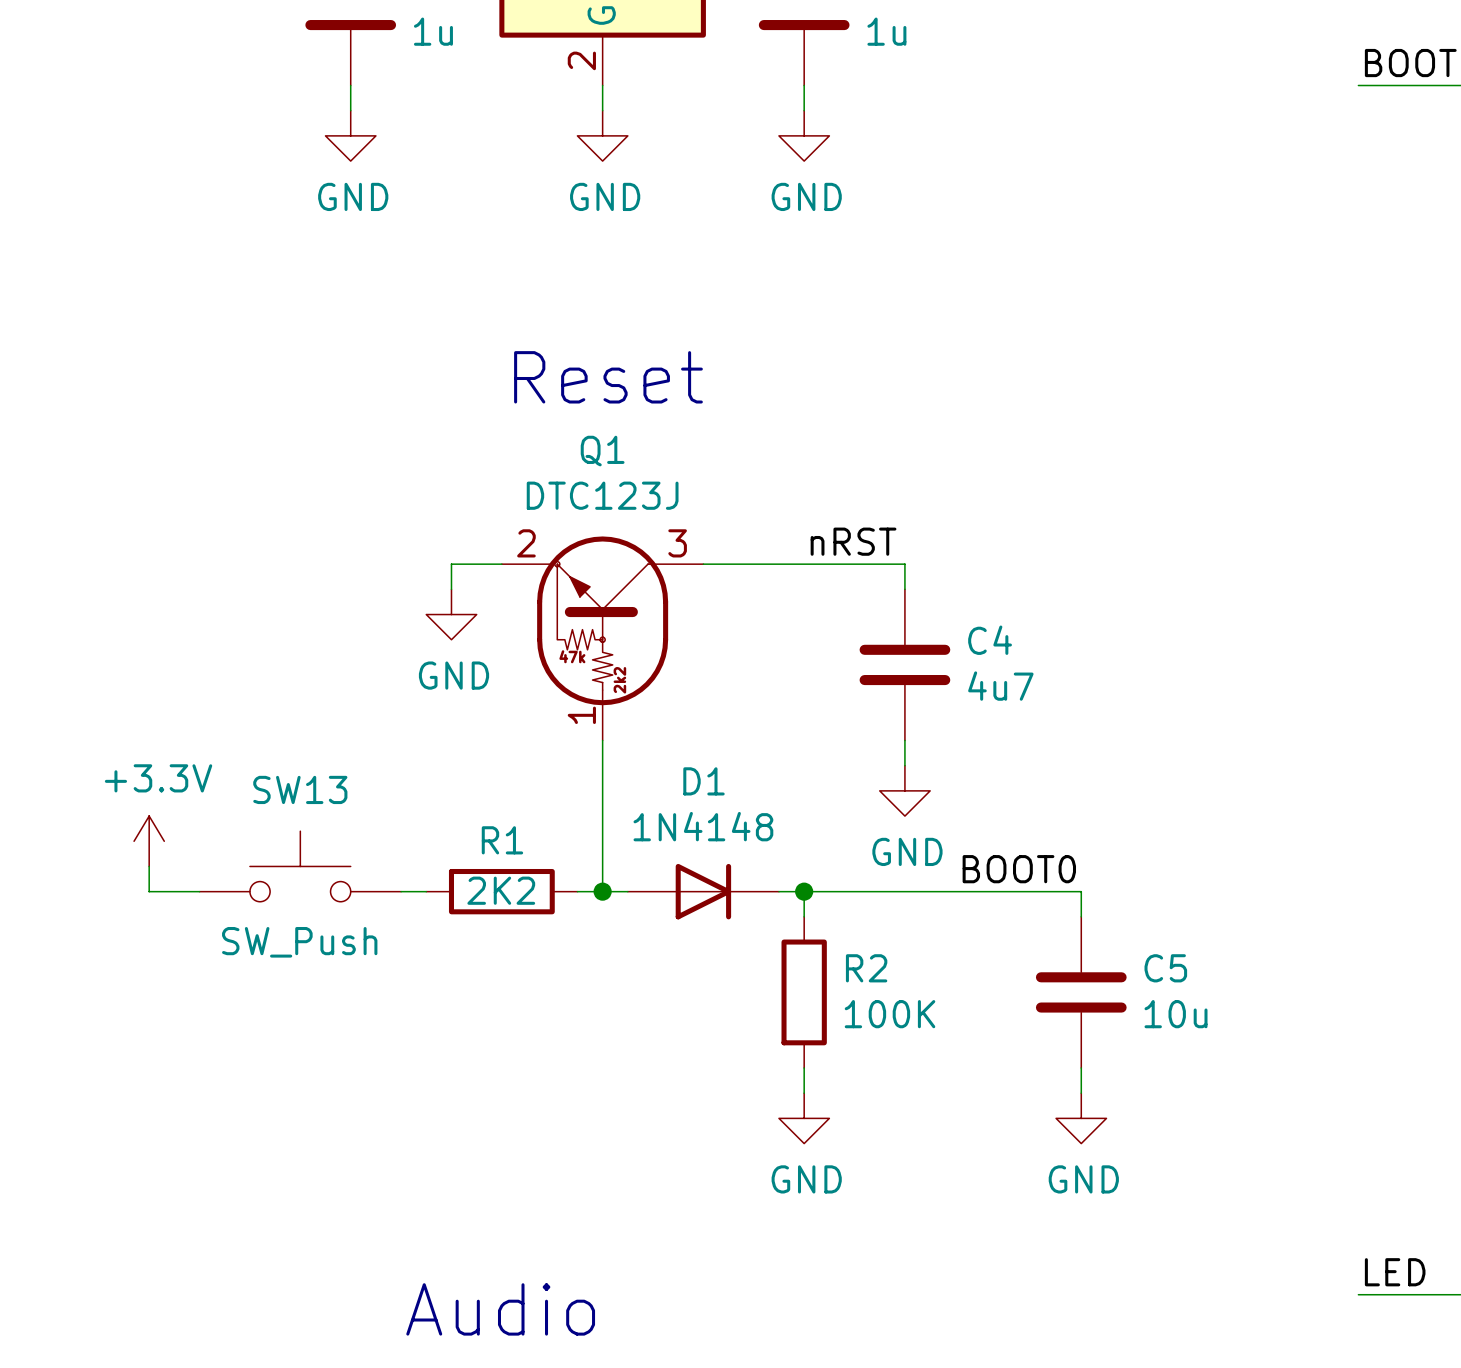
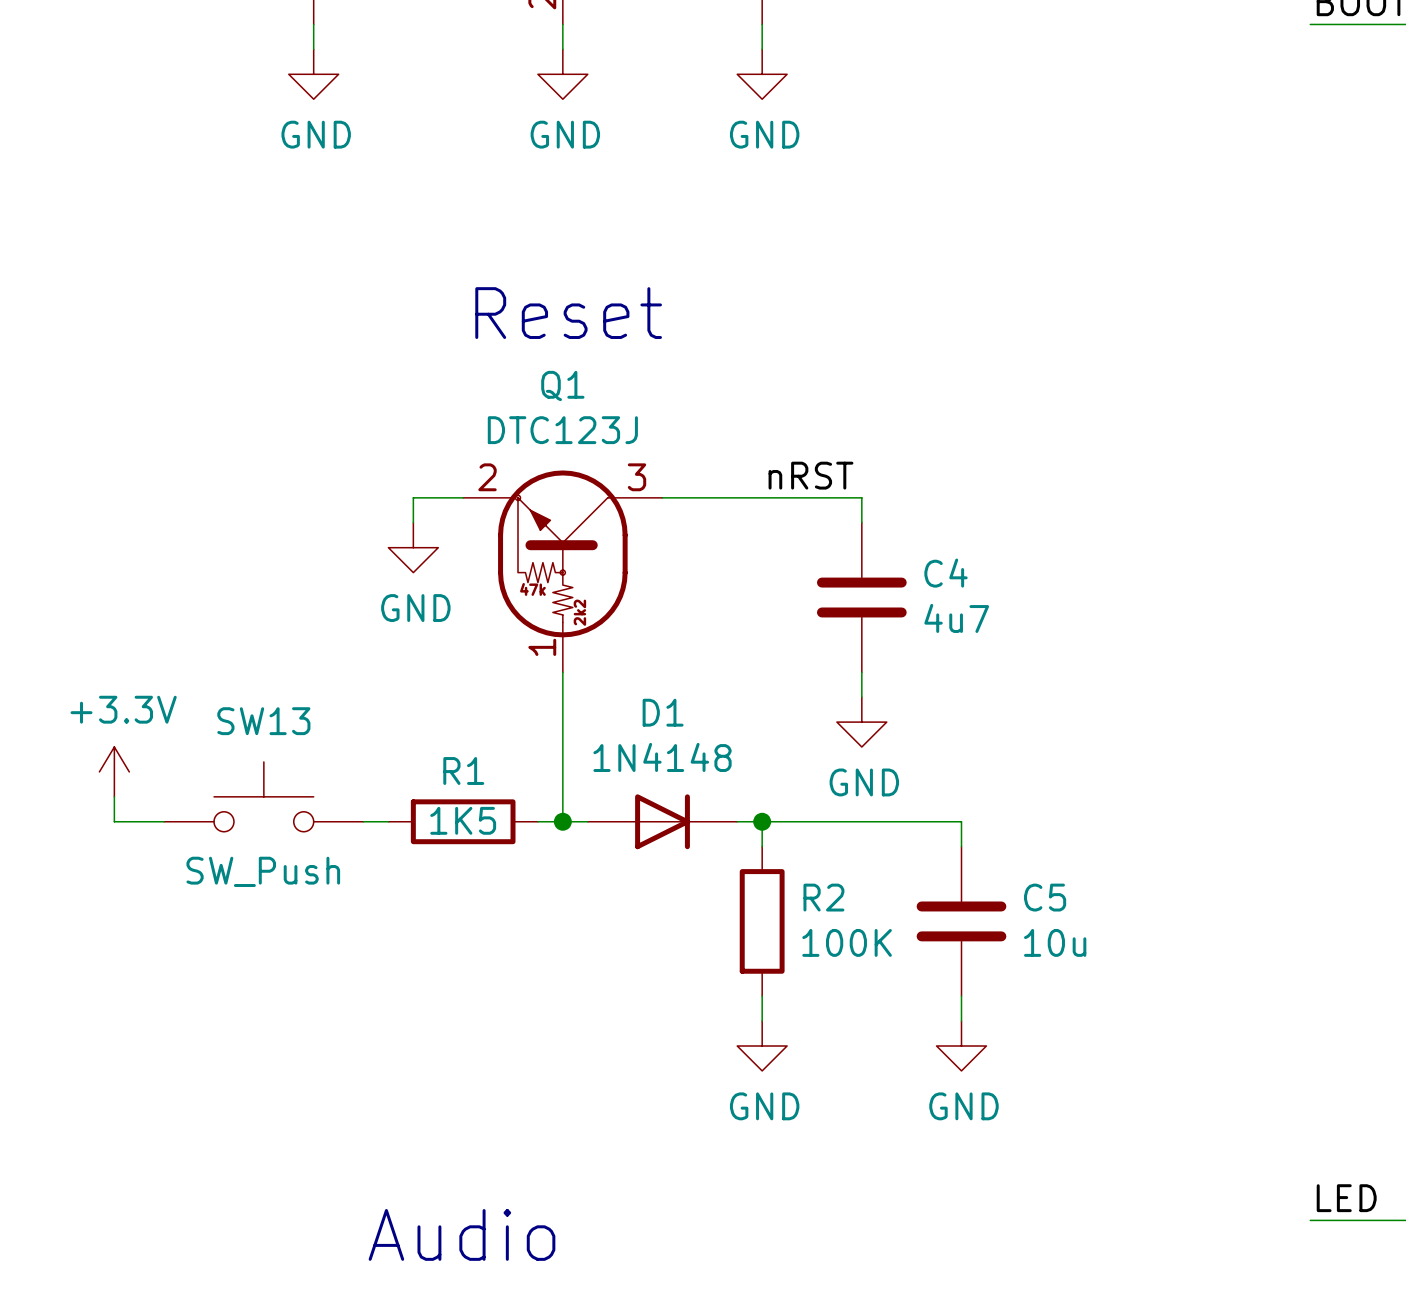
label: BOOT0 (1019, 869) -> none
R1 value: 2K2 (501, 890) -> 1K5 (463, 820)
wire: (1005, 891) (1081, 891) (1081, 916) -> (961, 821) (961, 846)
C5 position: (1081, 992) -> (961, 921)
wire: (1081, 1068) (1081, 1093) -> (961, 996) (961, 1021)
power symbol position: GND (1081, 1118) -> GND (961, 1046)

